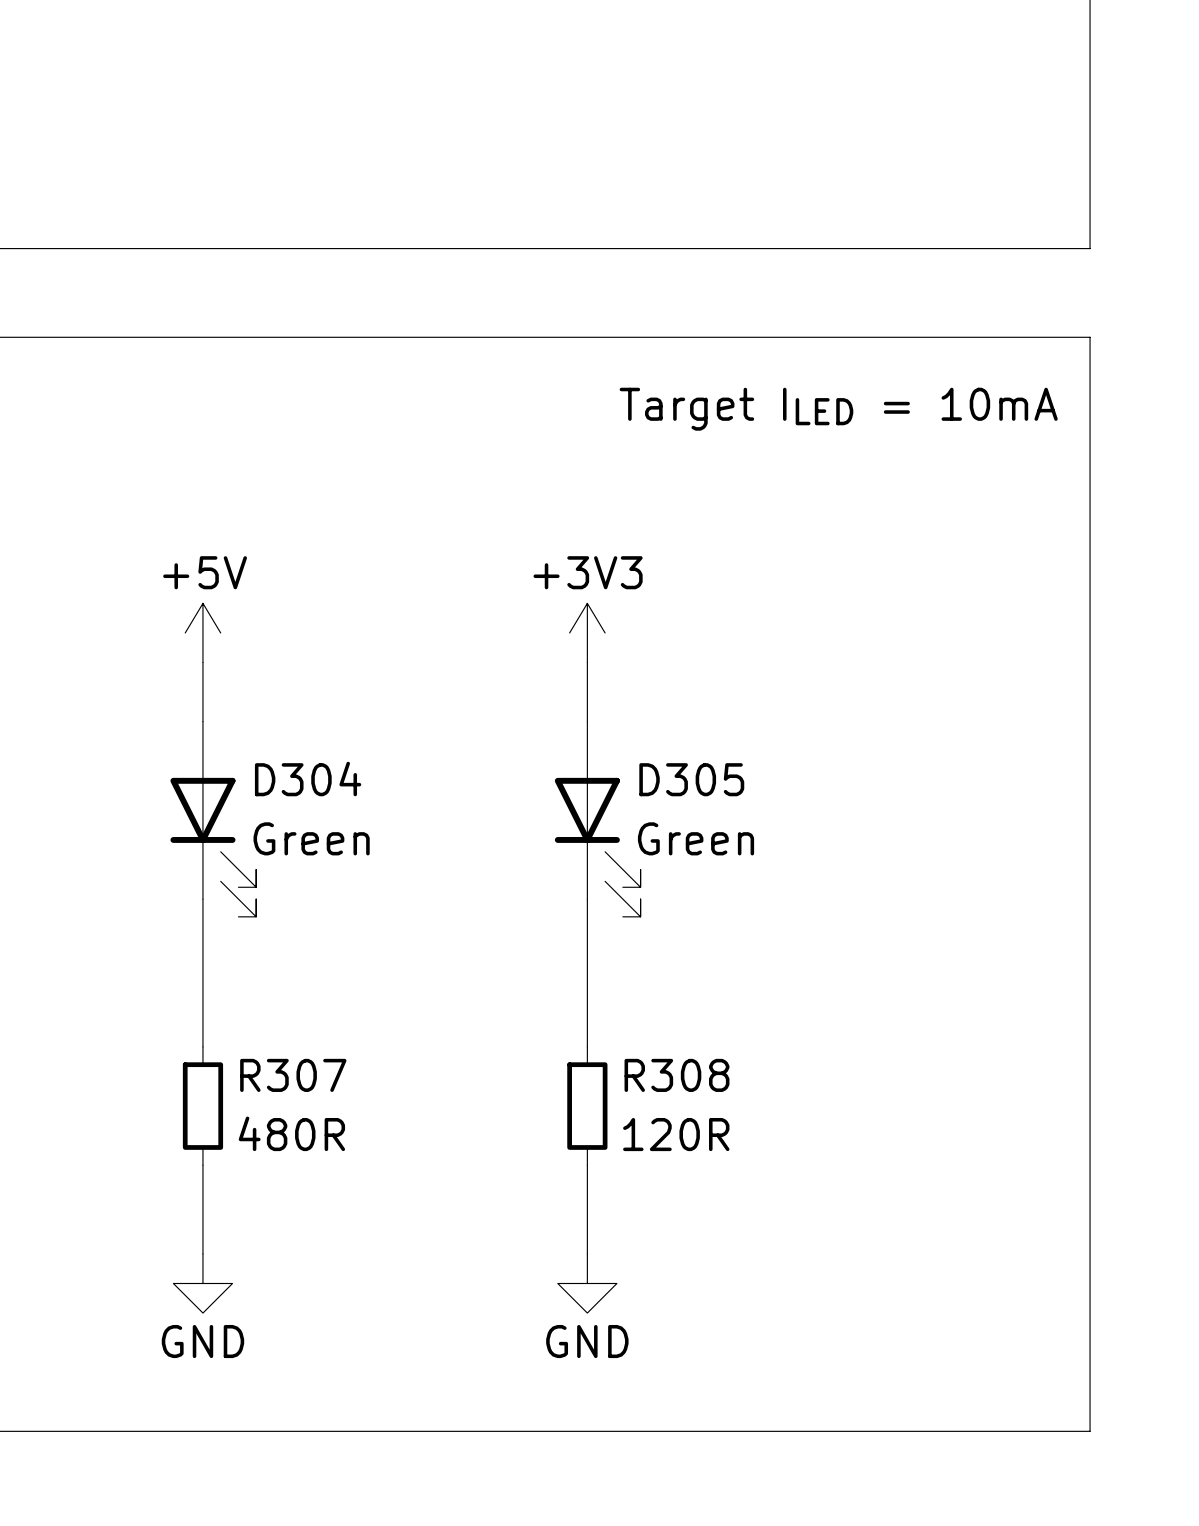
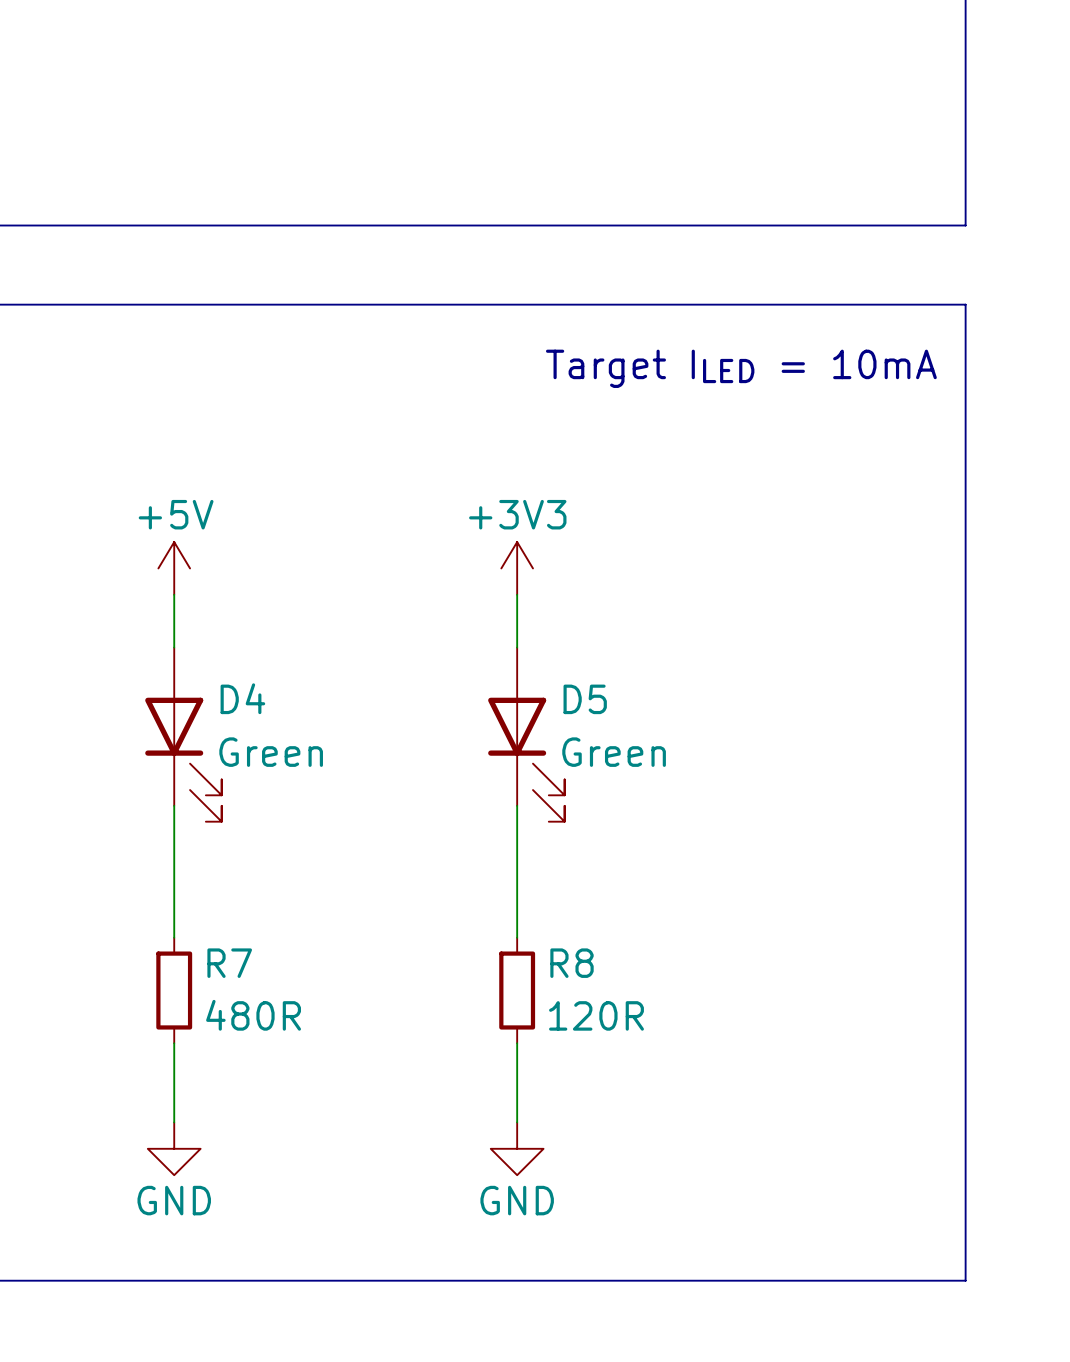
D304 name: D304 (308, 779) -> D4 (242, 698)
D305 name: D305 (691, 779) -> D5 (585, 699)
R307 name: R307 (293, 1075) -> R7 (229, 963)
R308 name: R308 (676, 1075) -> R8 (572, 963)

